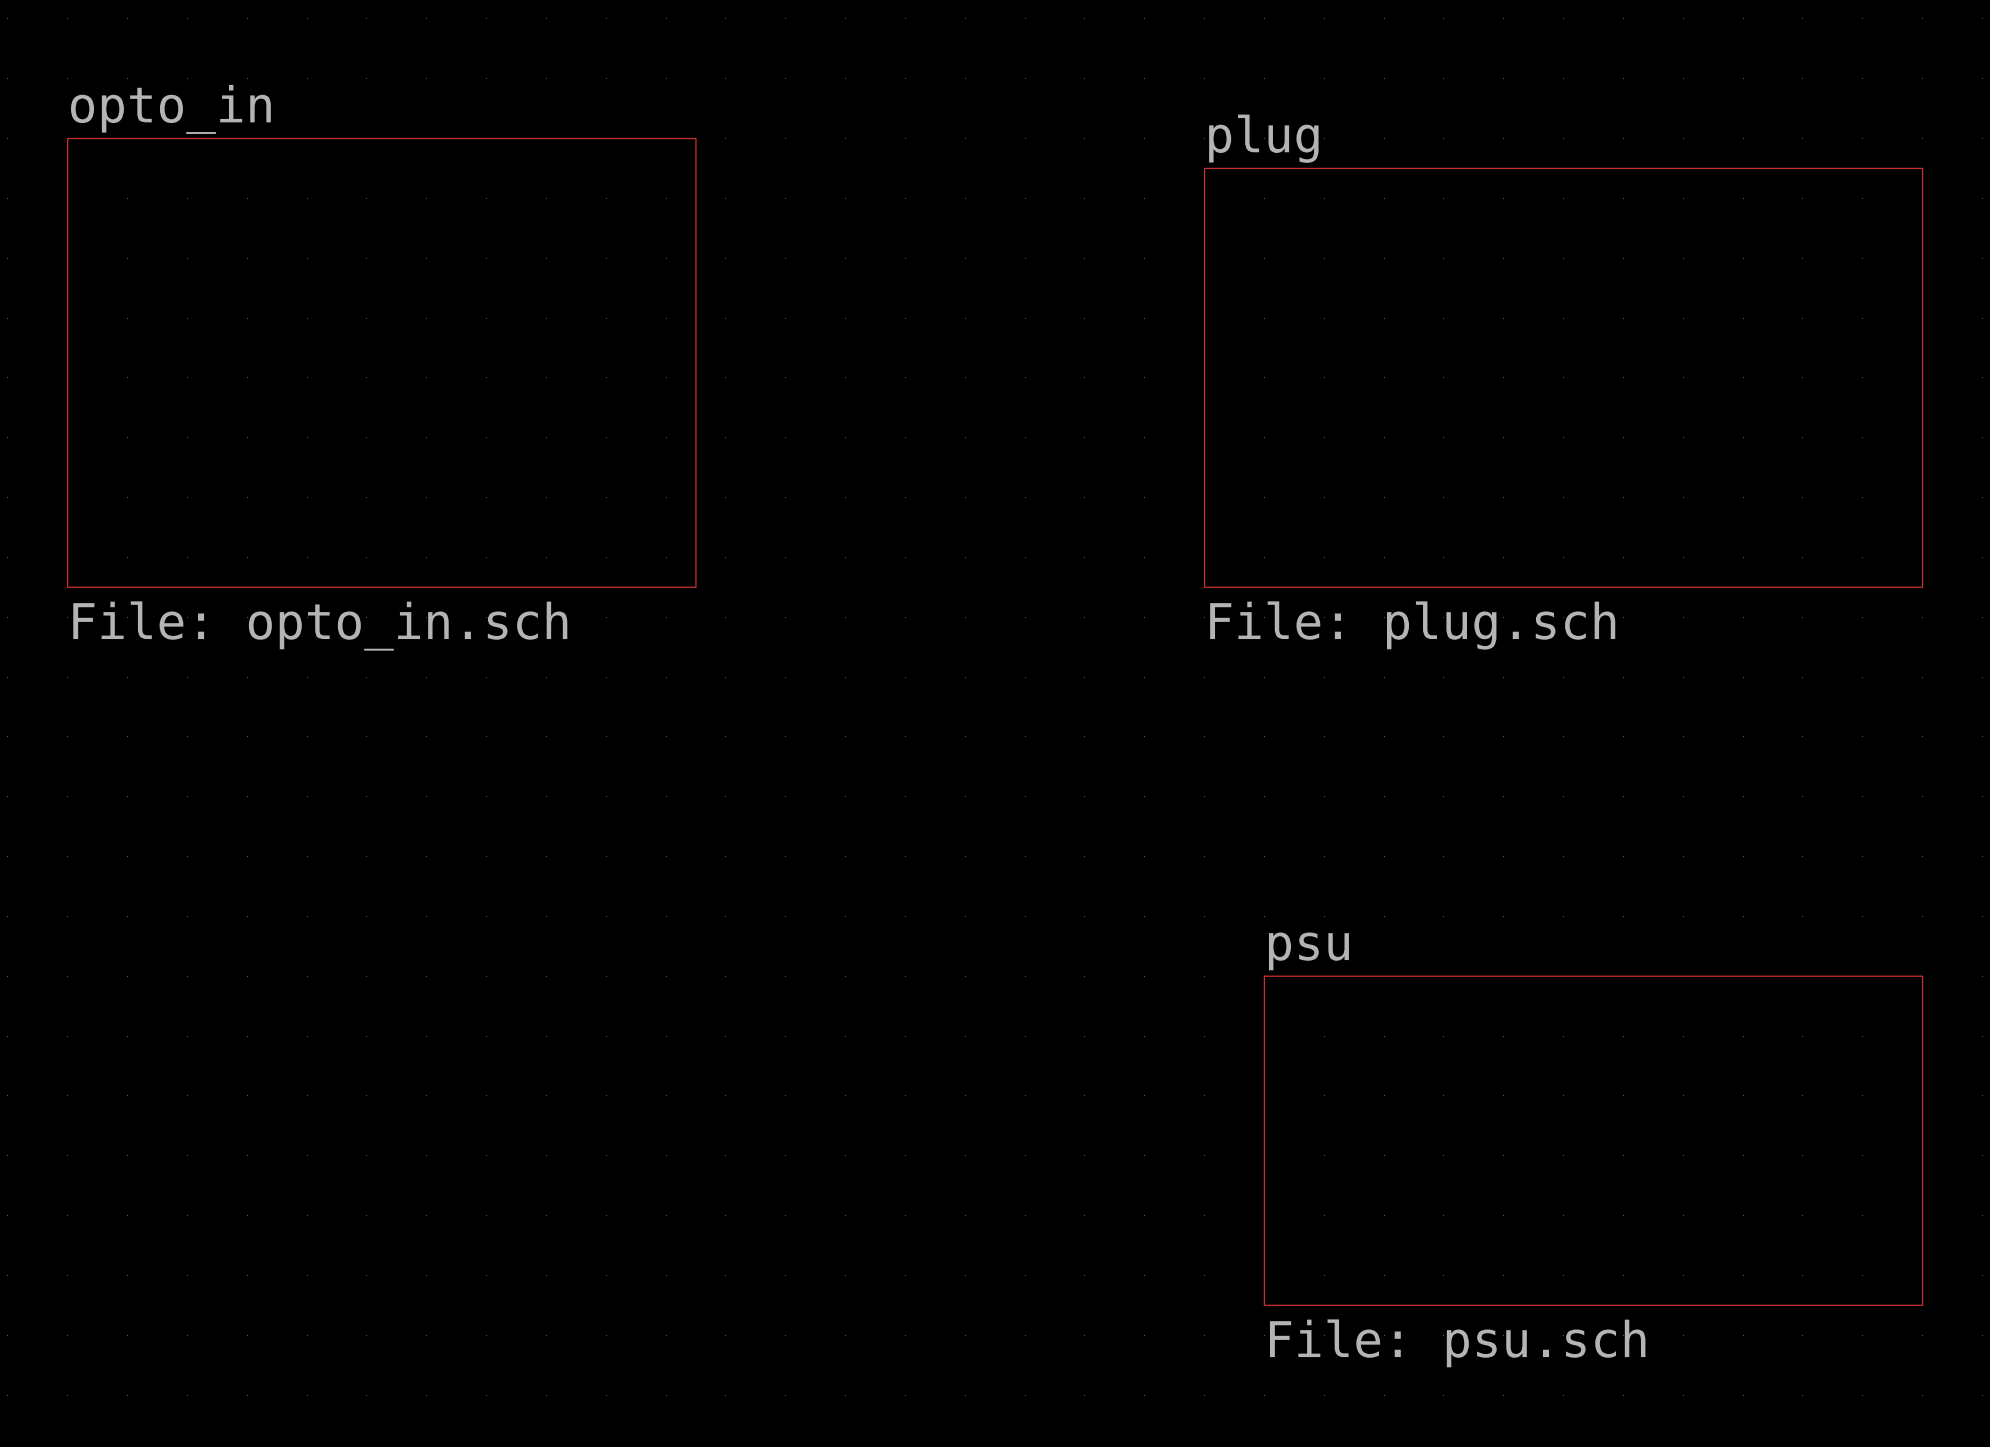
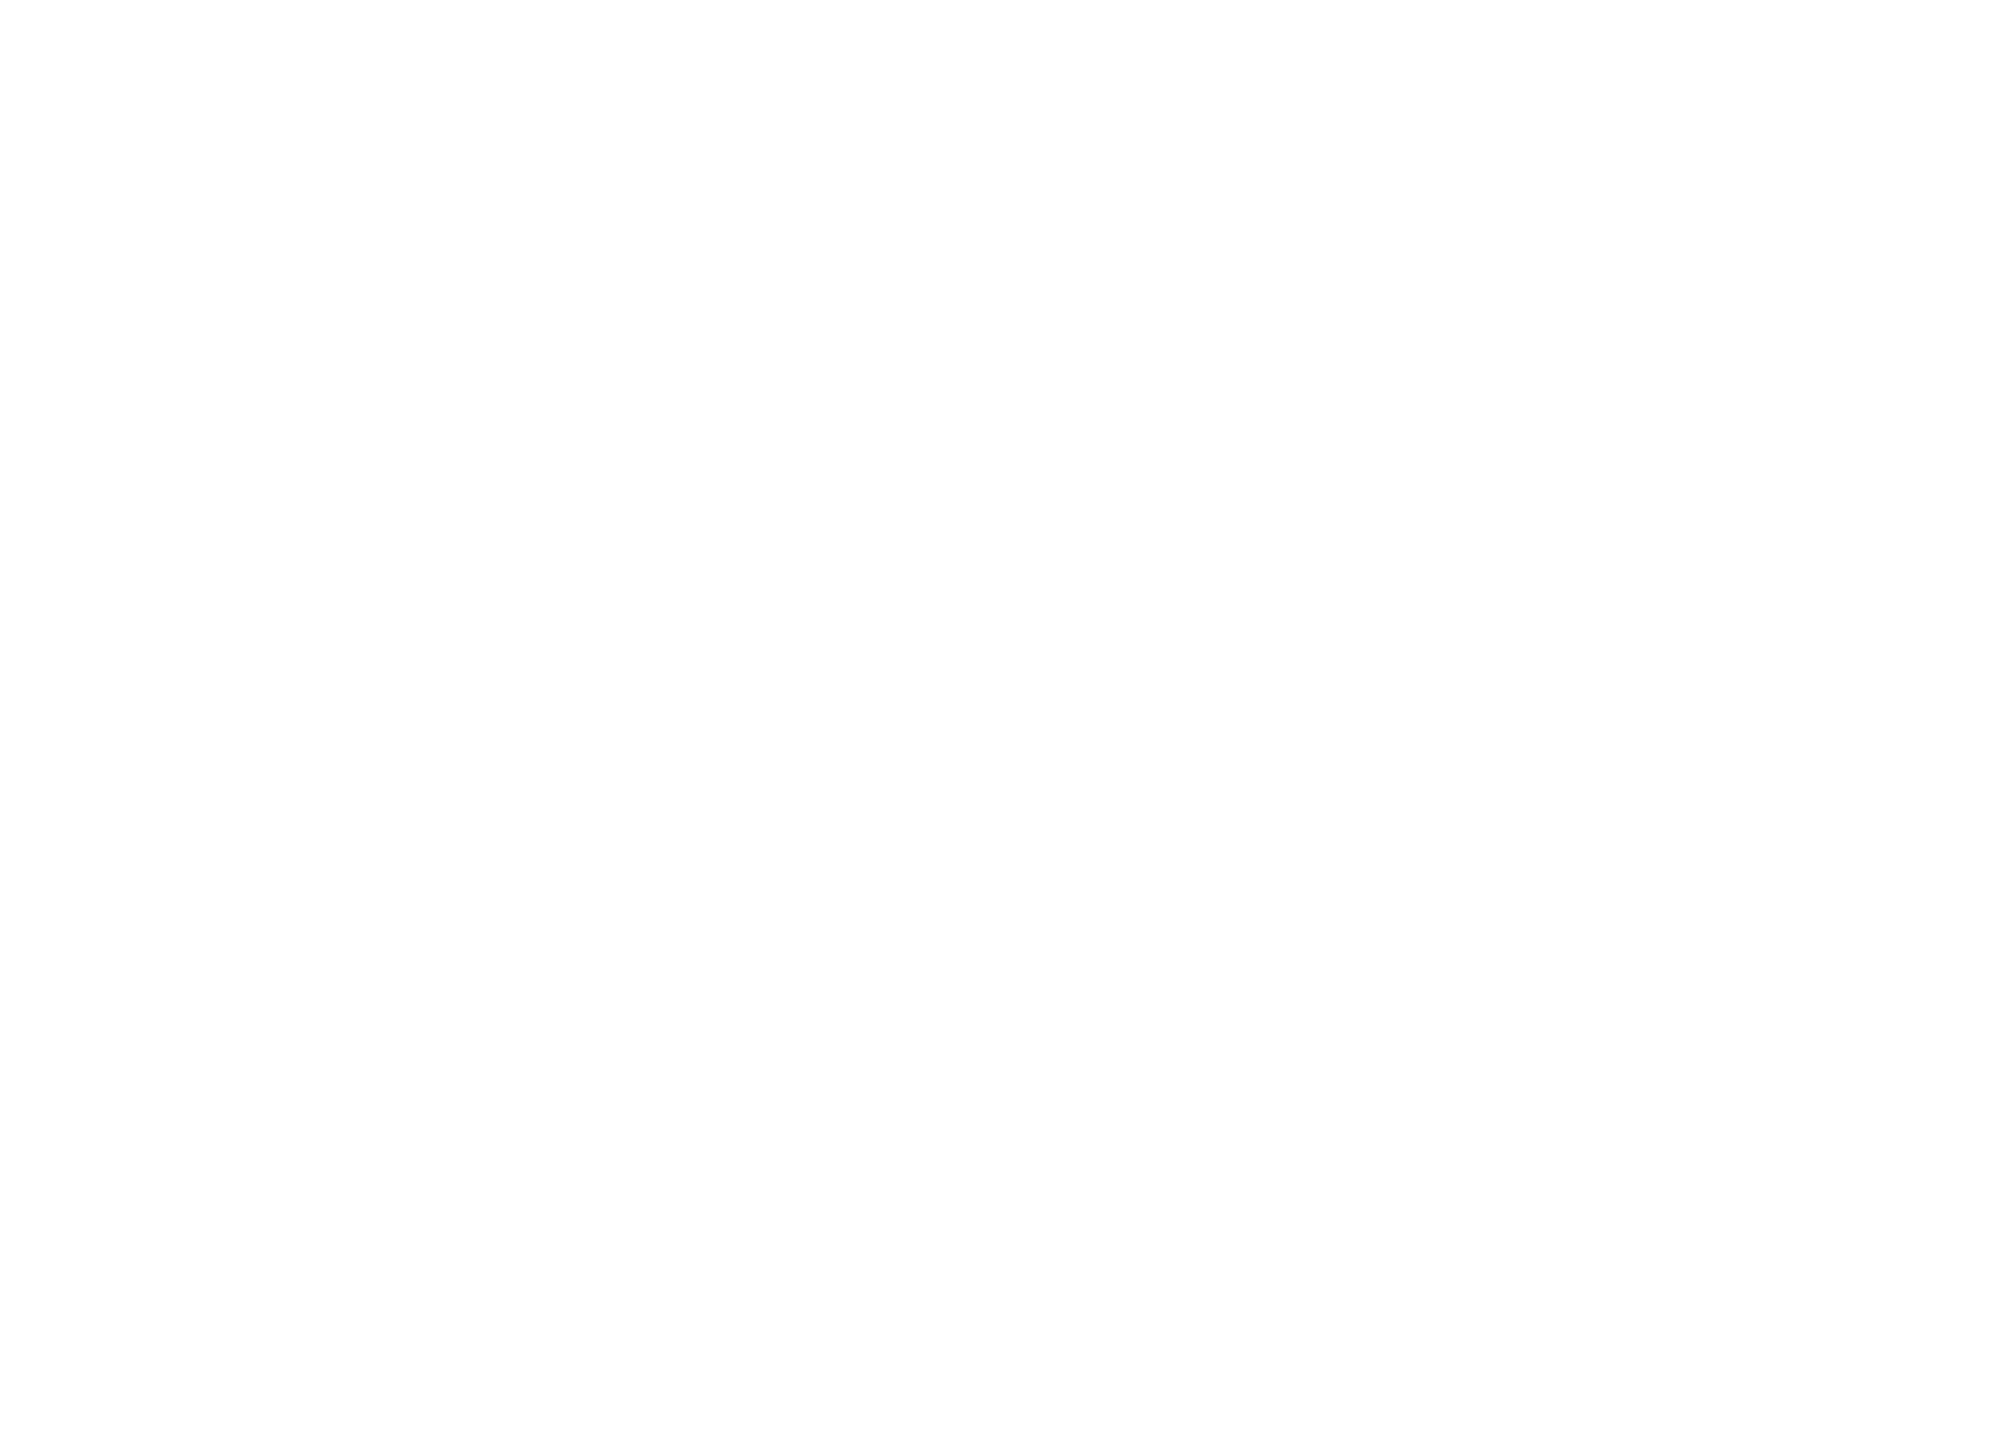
sheet opto_in: File: opto_in.sch (381, 362) -> none
sheet plug: File: plug.sch (1563, 377) -> none
sheet psu: File: psu.sch (1593, 1140) -> none

